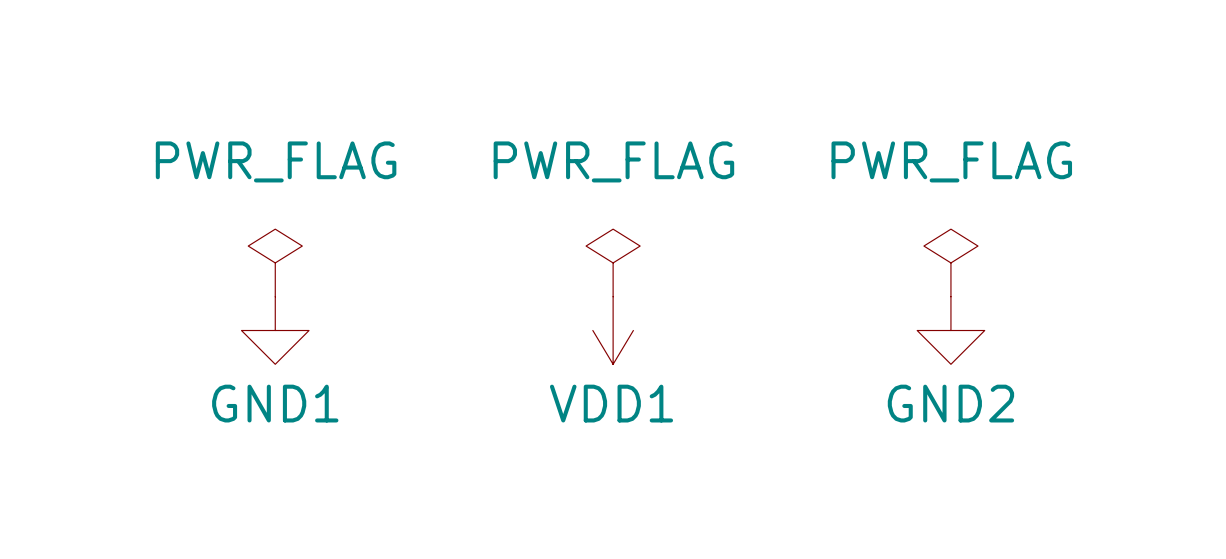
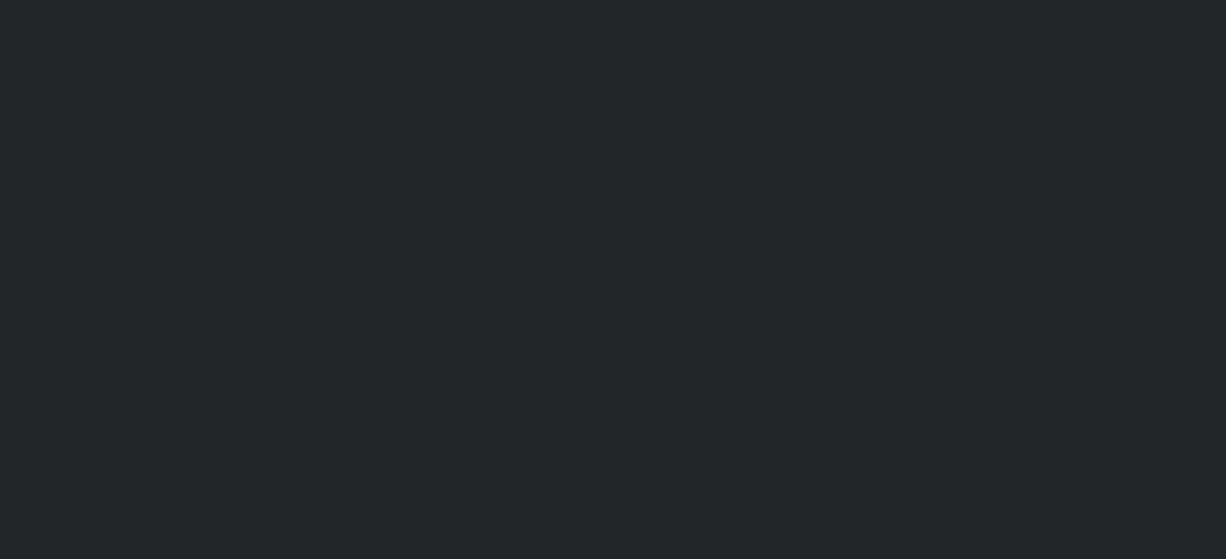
power symbol: PWR_FLAG (275, 262) -> none
power symbol: PWR_FLAG (613, 262) -> none
power symbol: PWR_FLAG (950, 262) -> none
power symbol: GND1 (275, 330) -> none
power symbol: VDD1 (613, 330) -> none
power symbol: GND2 (950, 330) -> none

